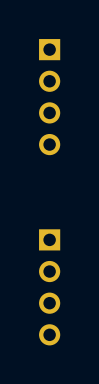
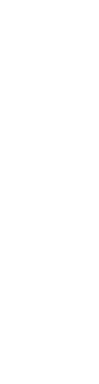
part: (49, 97) -> none
part: (49, 287) -> none

